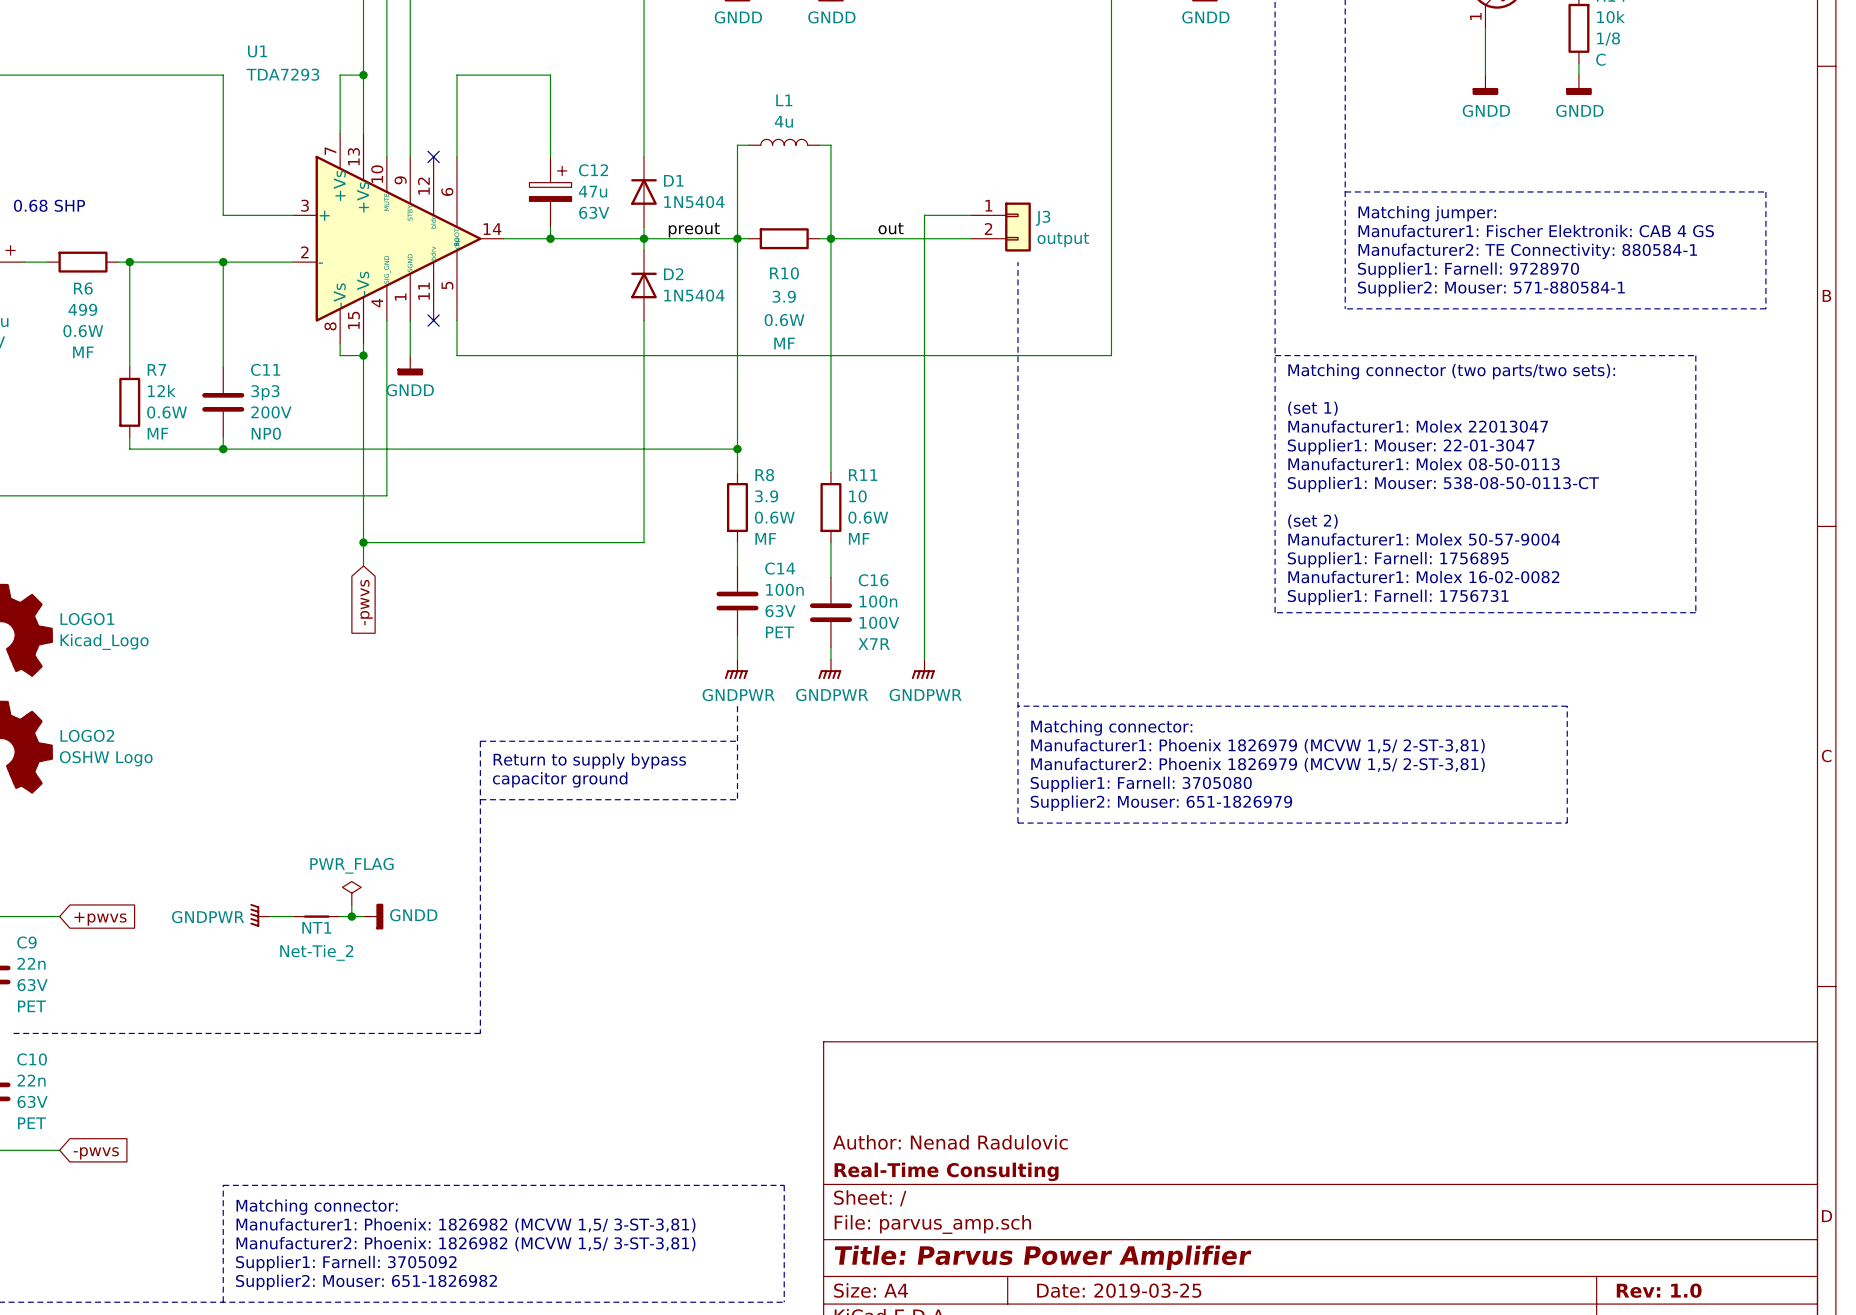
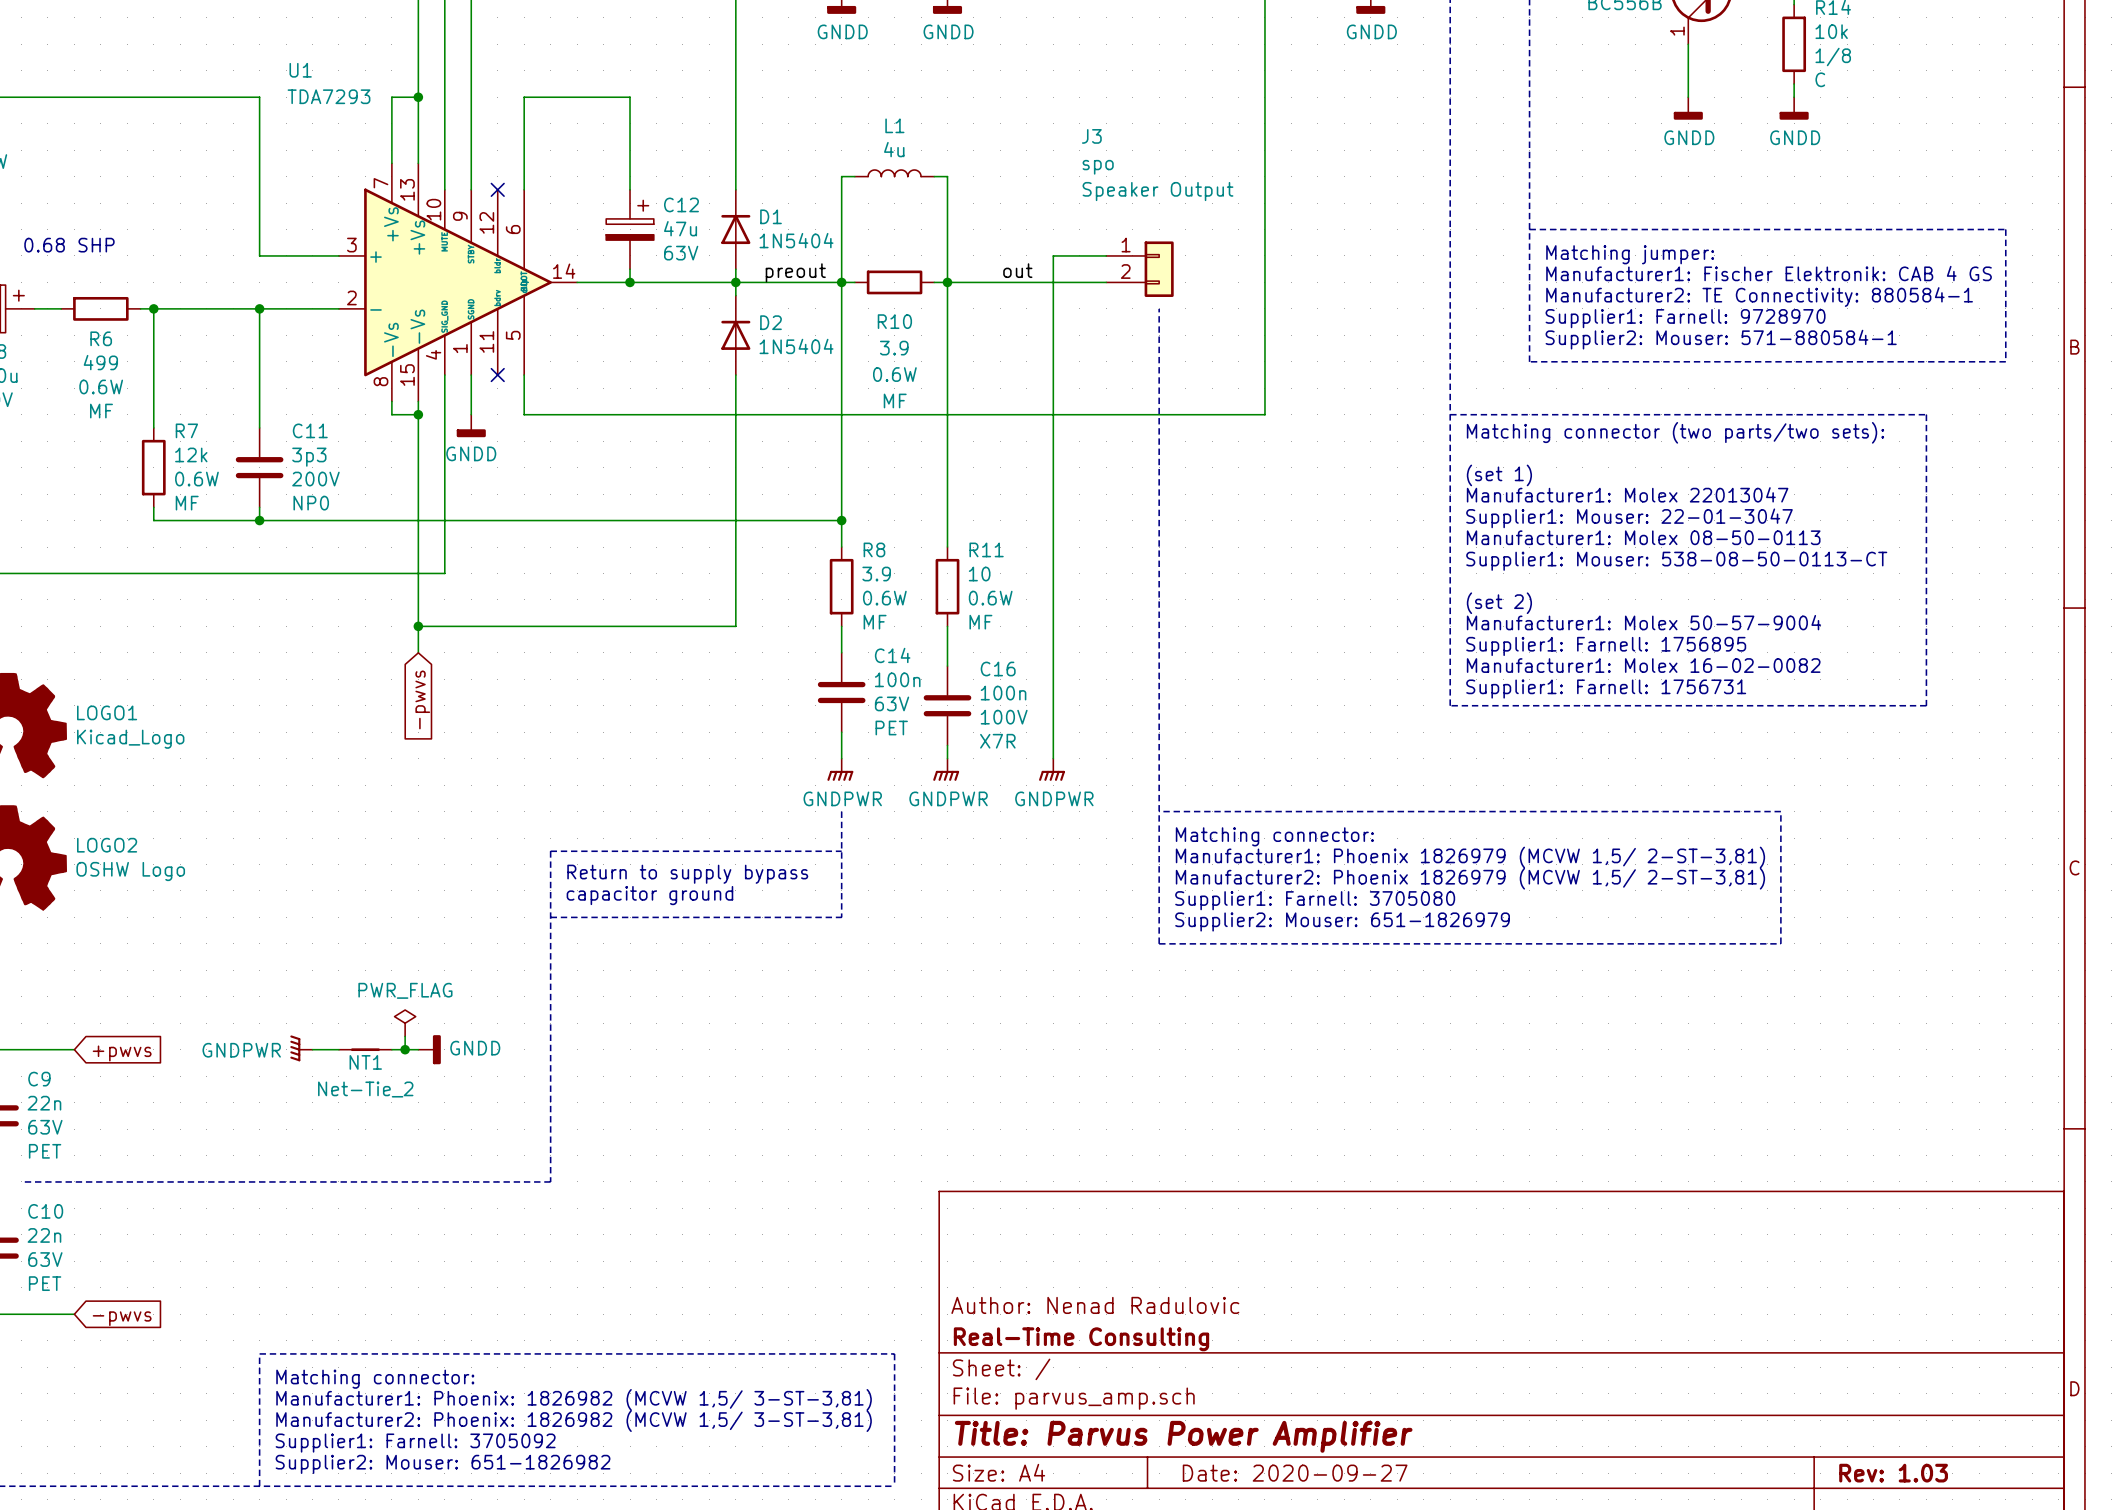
J3 text: none -> Speaker Output (1157, 191)
J3 name position: J3 (1043, 218) -> J3 (1091, 136)
J3 value: output (1063, 239) -> spo (1098, 167)
title block: Date: 2019-03-25 (1119, 1290) -> Date: 2020-09-27 (1295, 1473)
title block: Rev: 1.0 (1659, 1290) -> Rev: 1.03 (1893, 1473)

